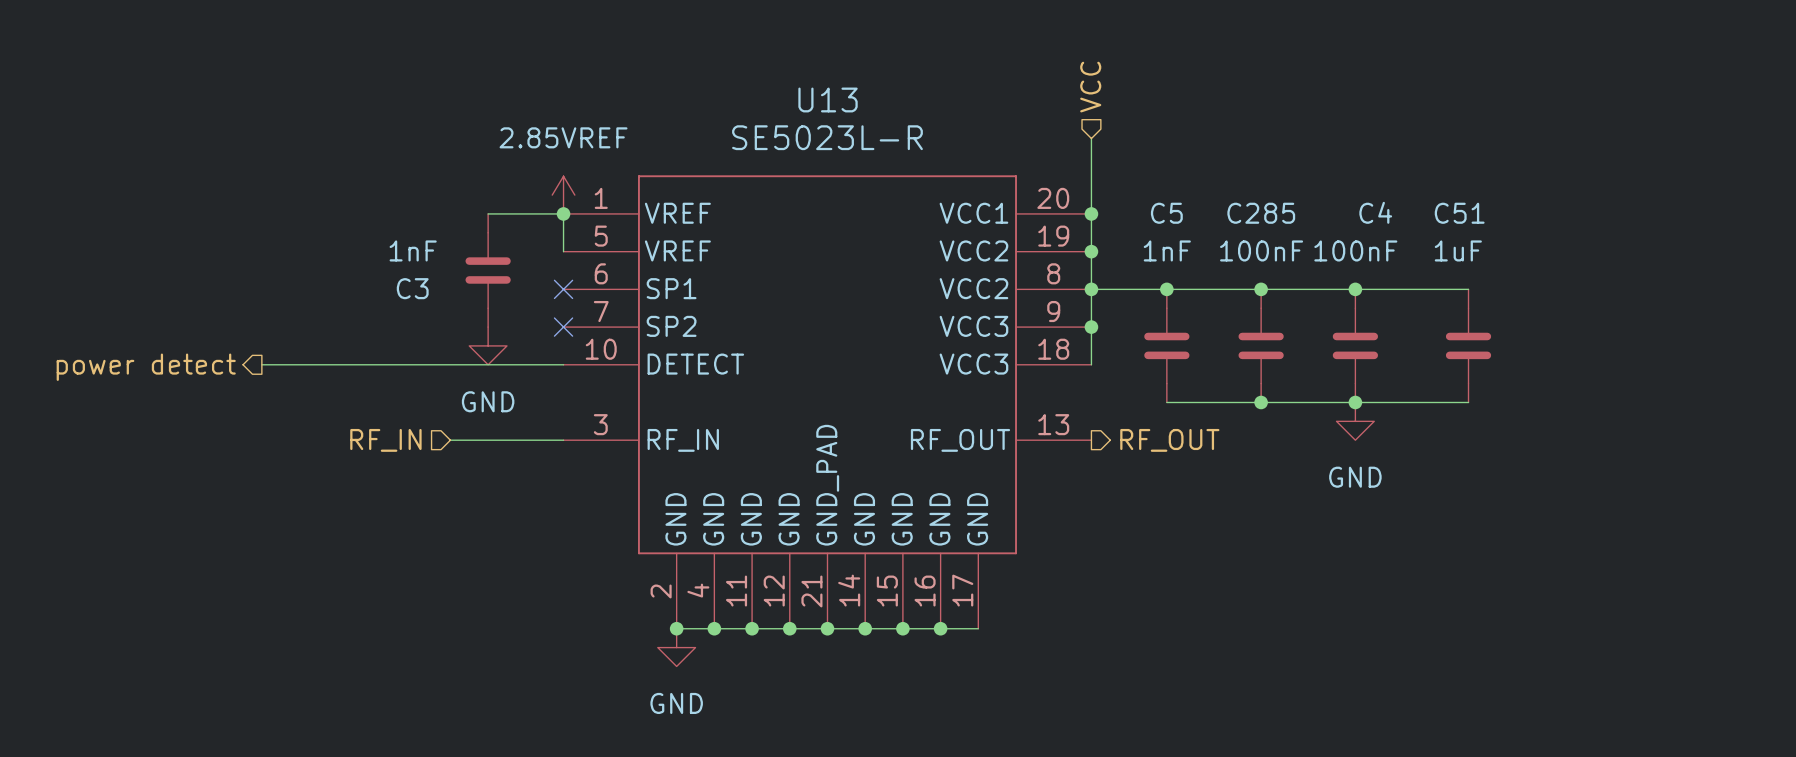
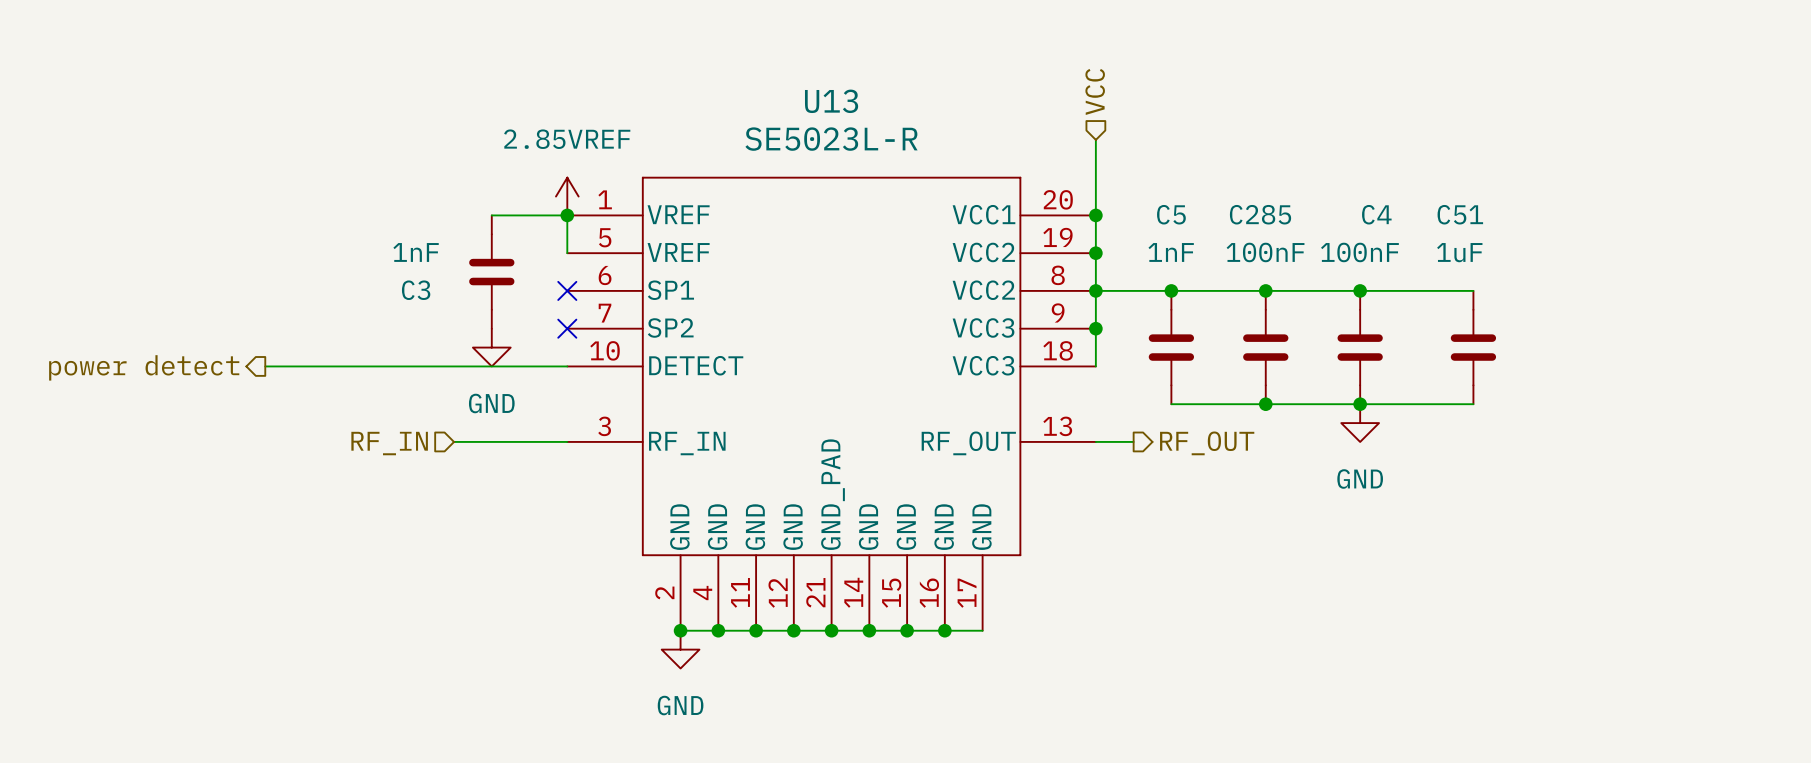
wire: none -> (1095, 441) (1133, 441)
hierarchical label position: RF_OUT (1169, 440) -> RF_OUT (1207, 443)

